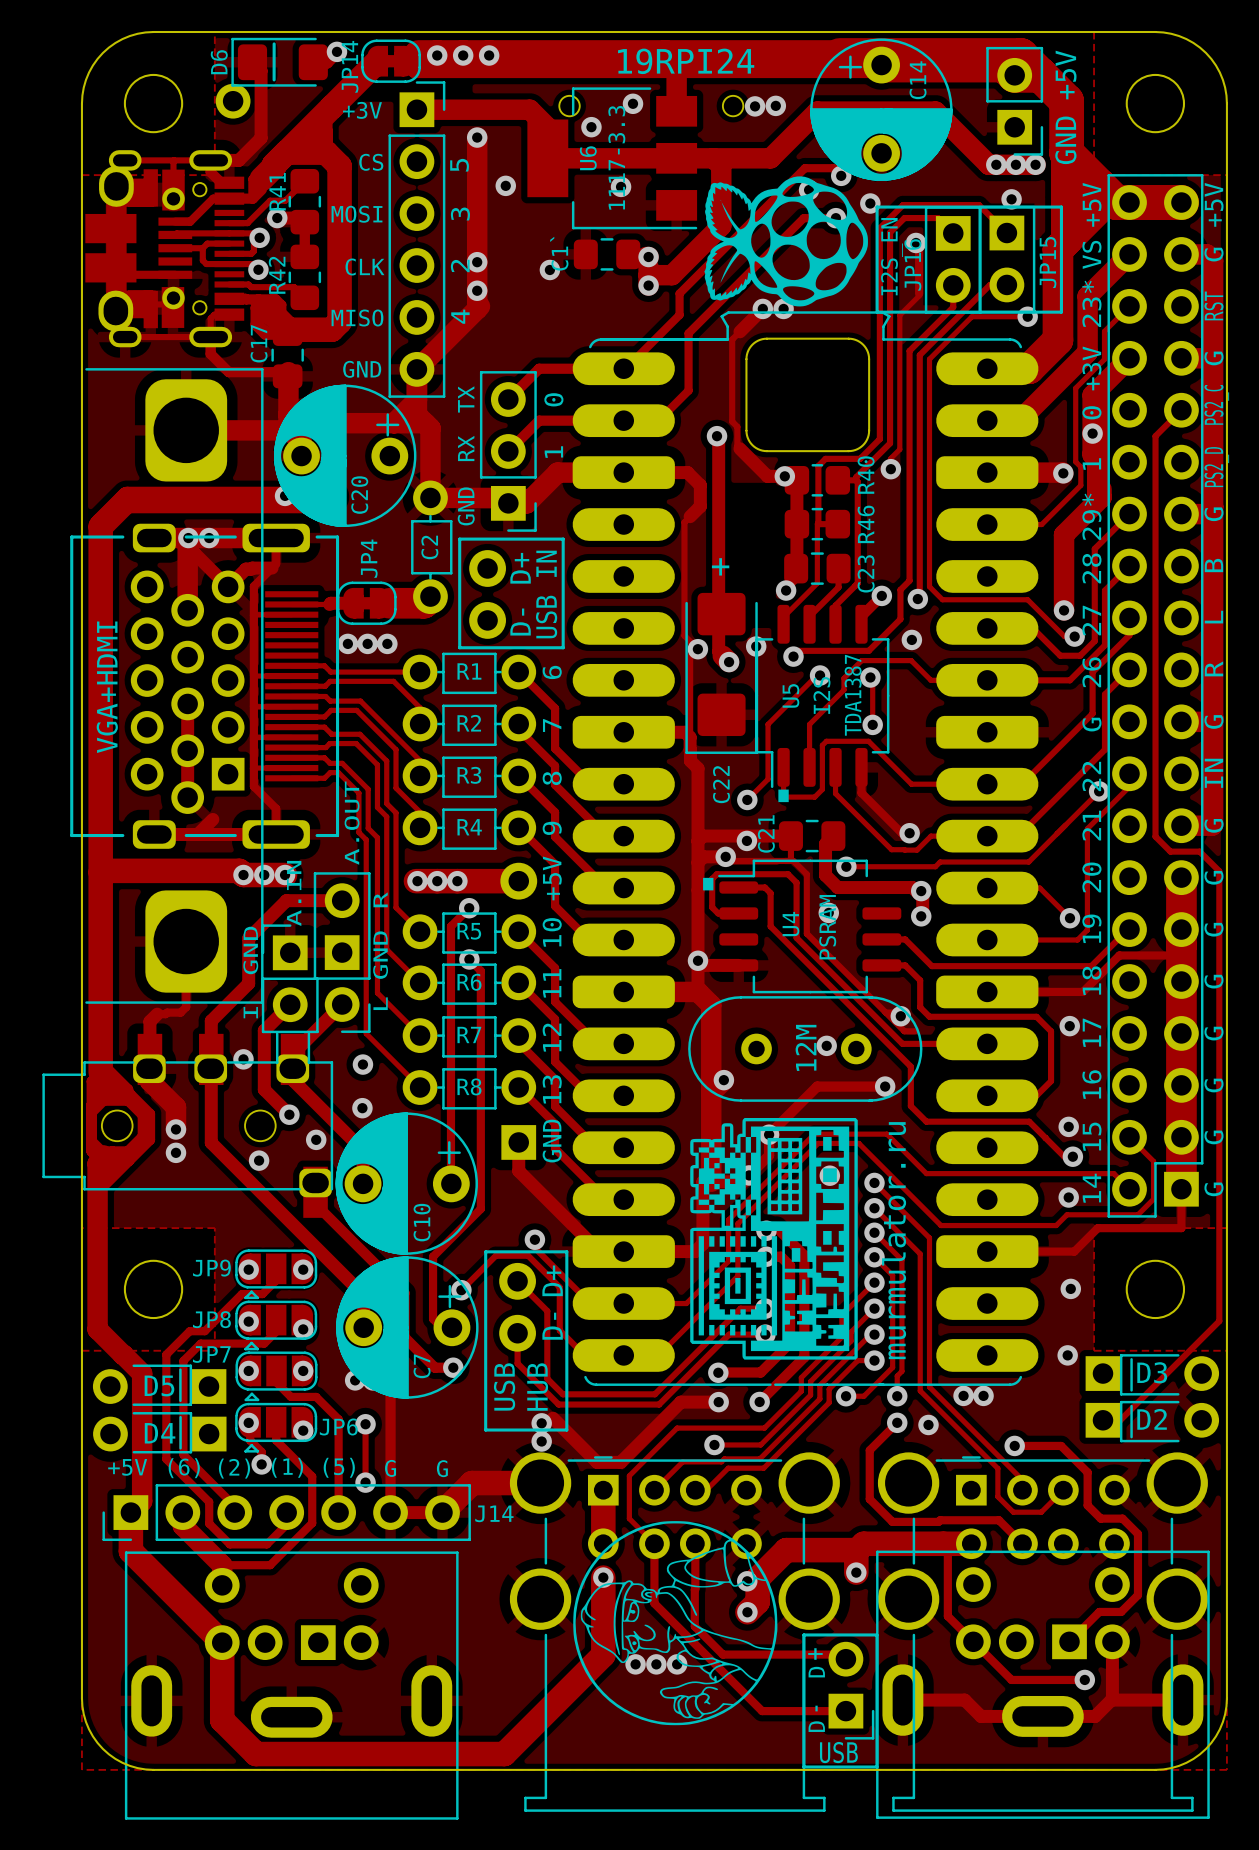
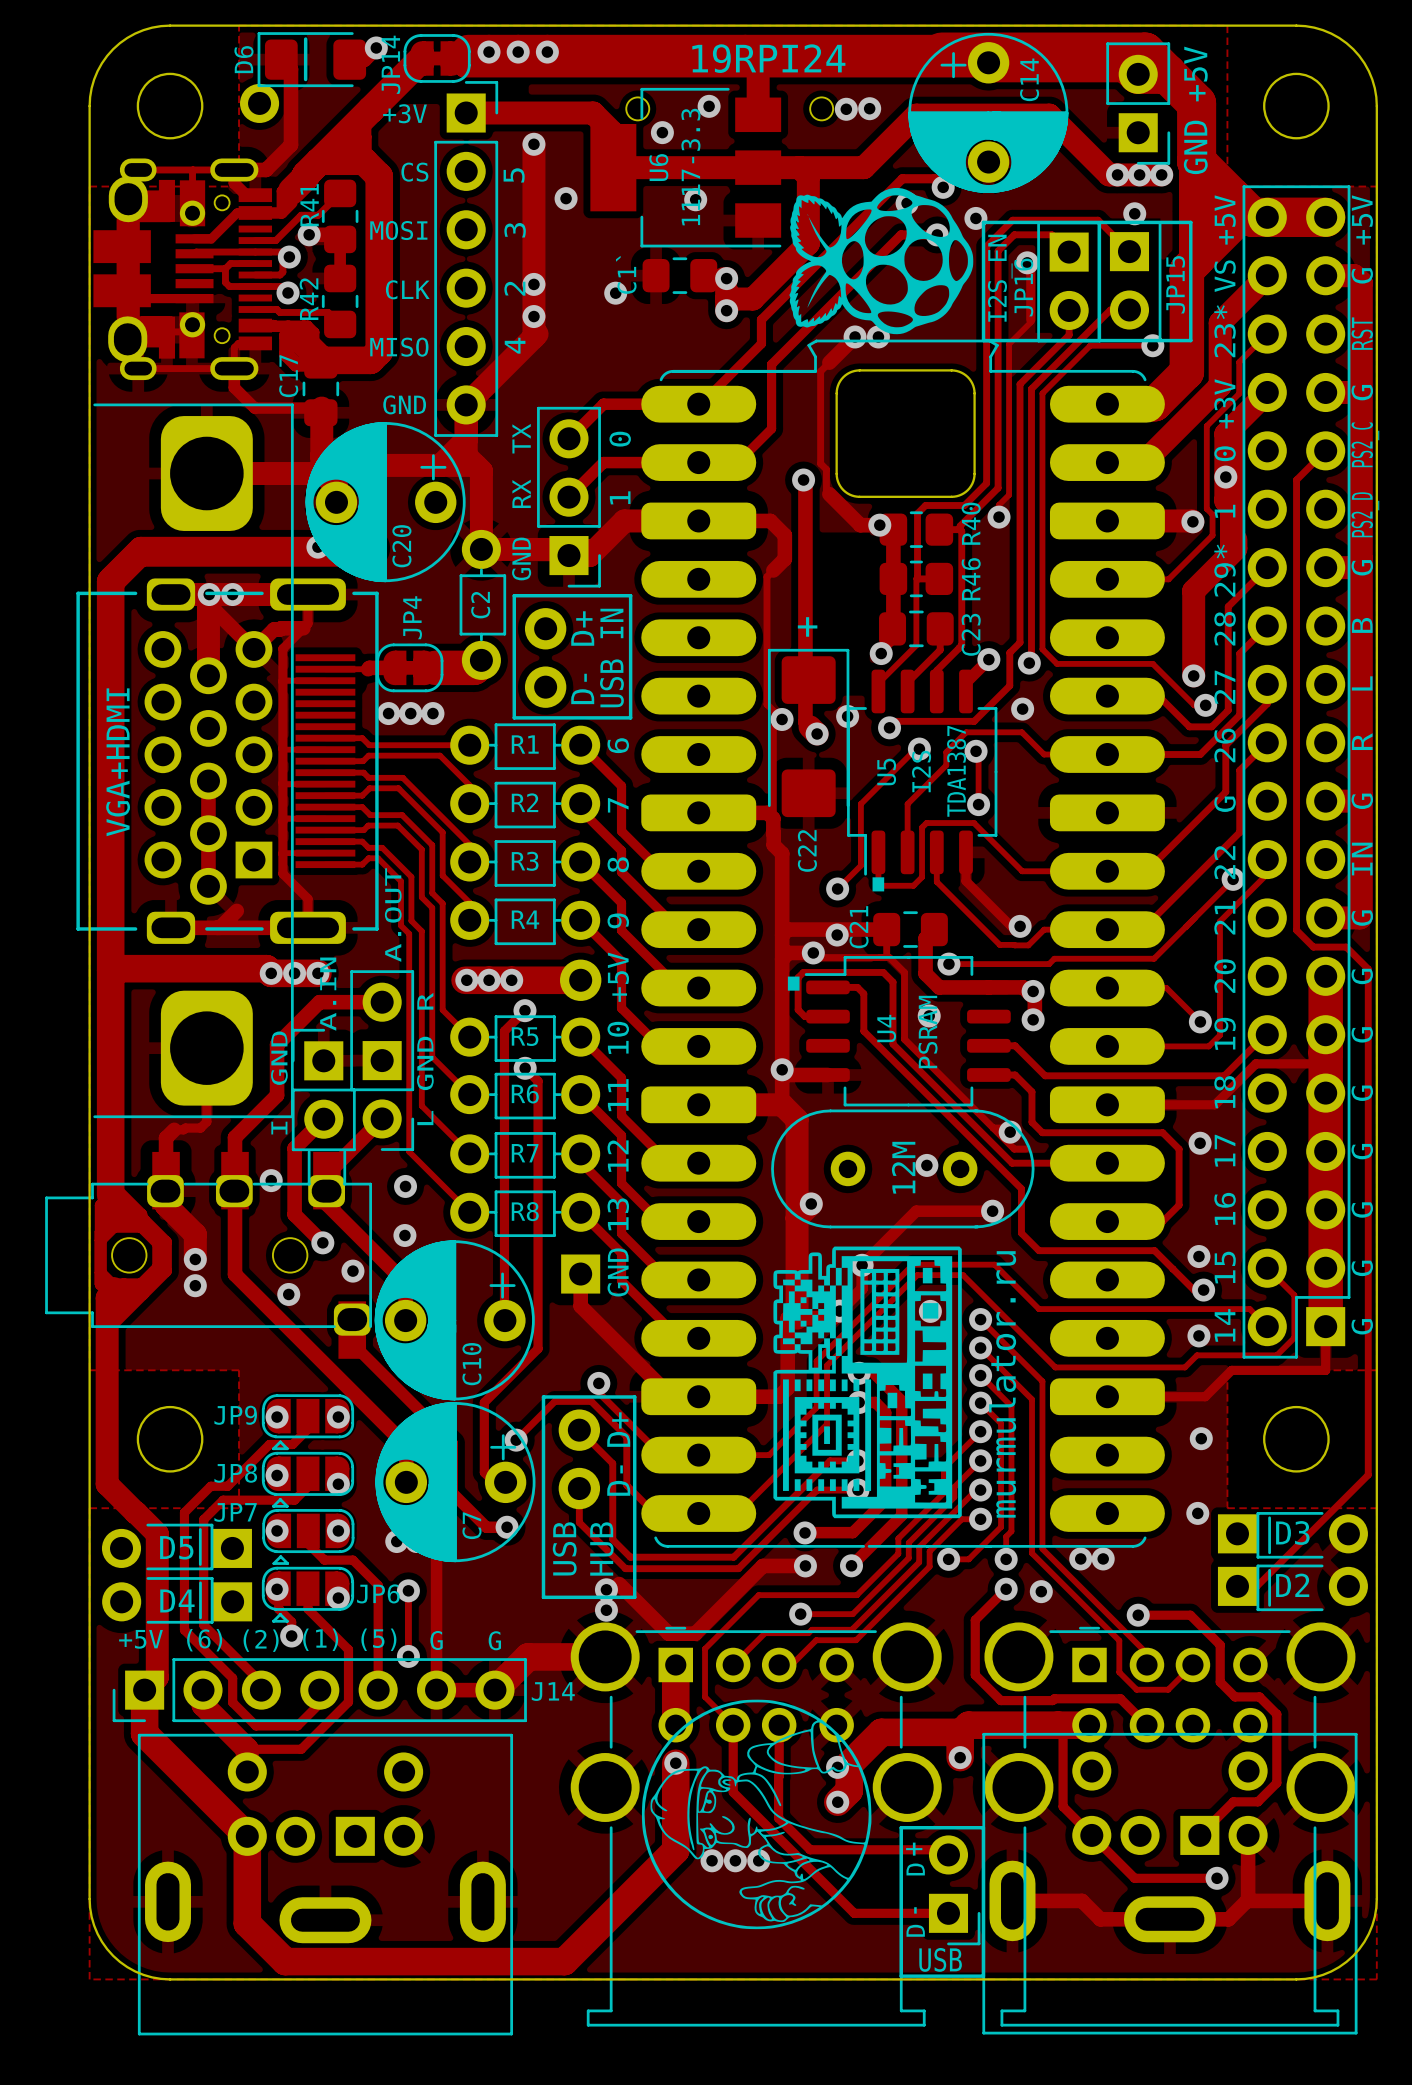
C22 footprint: [685, 592, 758, 754] -> [767, 648, 850, 818]

